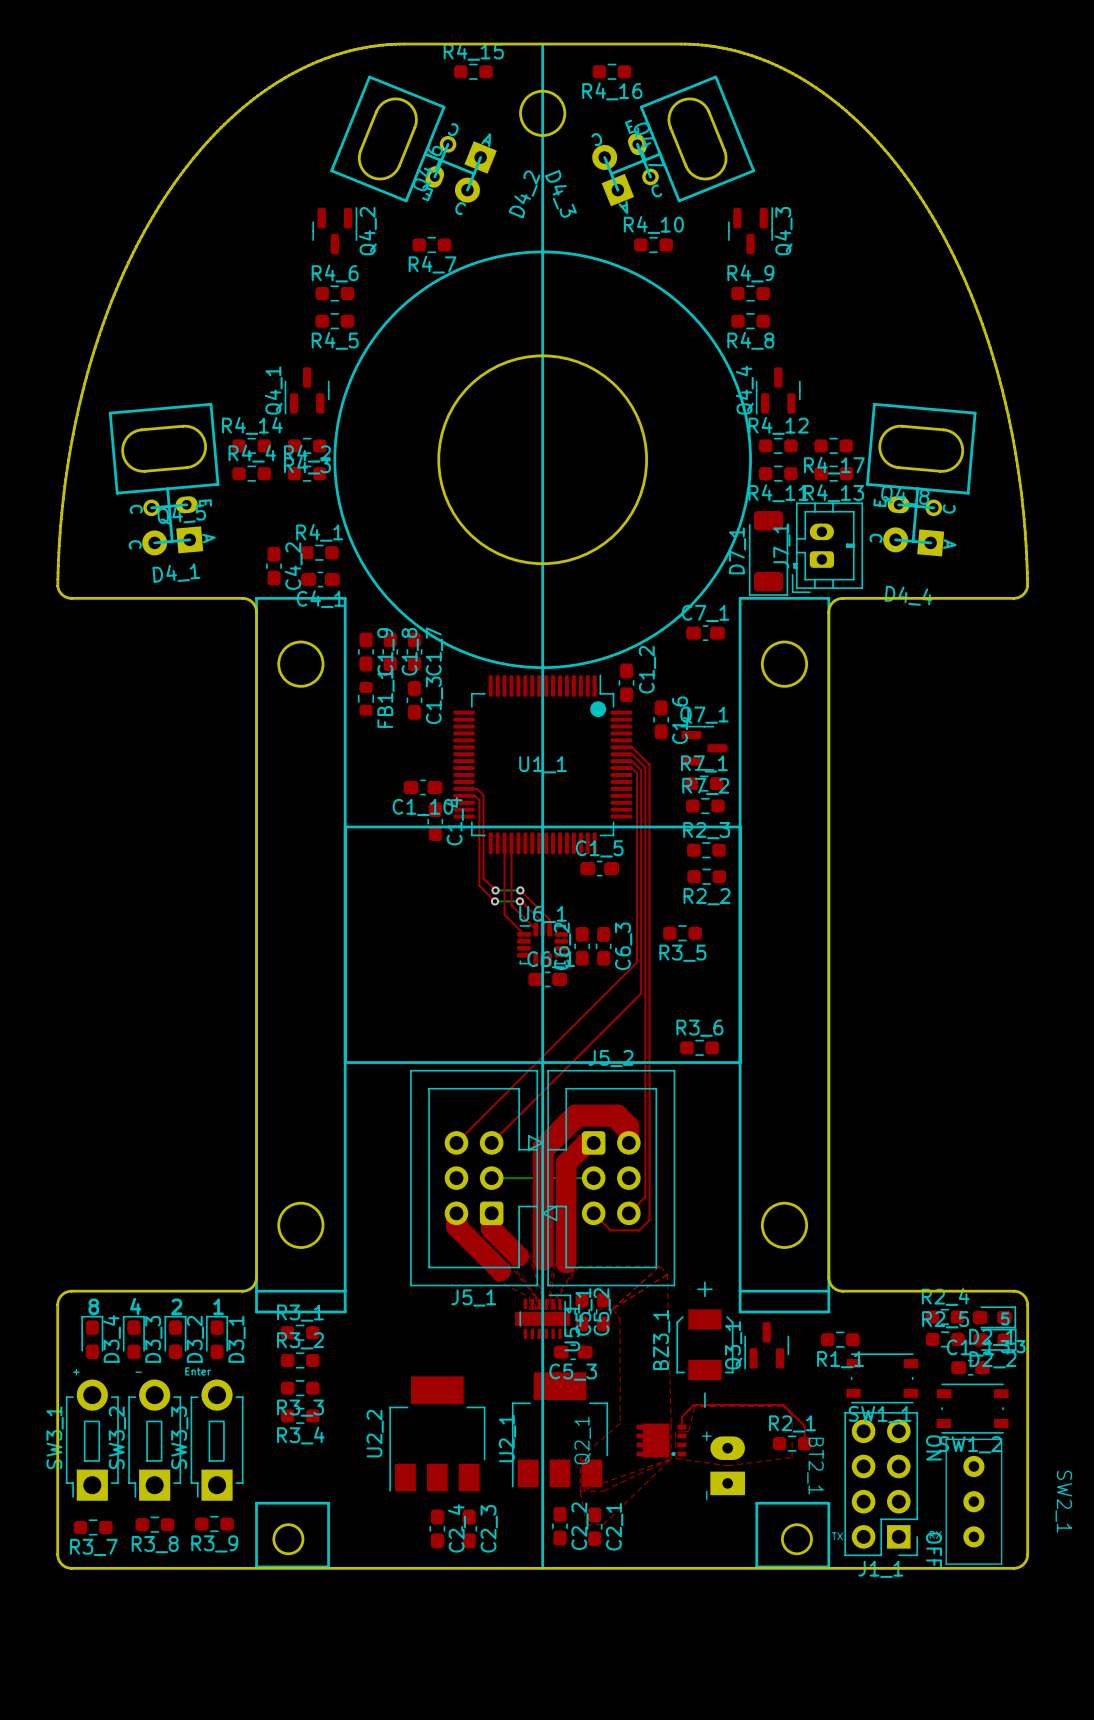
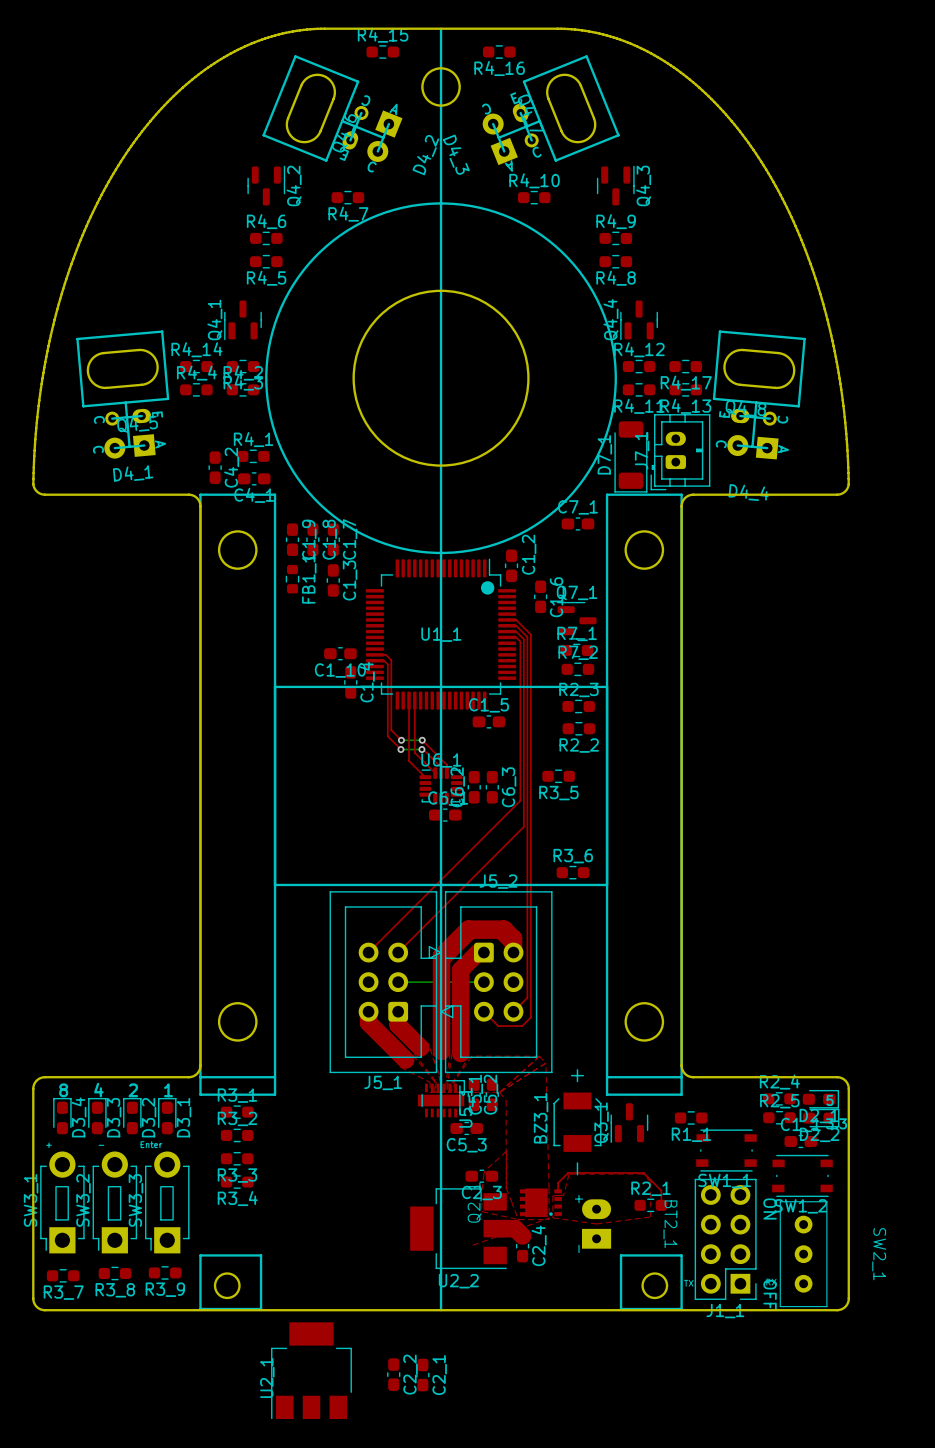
top zone outline: (620, 1423) (580, 1457) (580, 1491) -> none
top zone outline: (671, 1423) (671, 1458) -> (549, 1188) (549, 1219) (518, 1219)
U2_1 position: (559, 1429) -> (311, 1370)
U2_2 rotation: 0° (437, 1433) -> 90° counterclockwise (458, 1228)
U2_2 position: (437, 1433) -> (458, 1228)
top zone outline: (671, 1458) (603, 1491) (580, 1491) -> none
top zone outline: (671, 1458) (603, 1524) (586, 1524) (580, 1491) -> none
top zone outline: none -> (518, 1219) (506, 1188) (506, 1151) (484, 1170) (481, 1211) (518, 1219)
top track: none -> (495, 1228) (515, 1228) (522, 1236)
C2_2 position: (559, 1526) -> (393, 1374)
C2_1 position: (594, 1526) -> (422, 1375)
C2_4 position: (437, 1528) -> (522, 1246)
C2_3 rotation: 0° (469, 1528) -> 90° clockwise (481, 1176)
C2_3 position: (469, 1528) -> (481, 1176)

